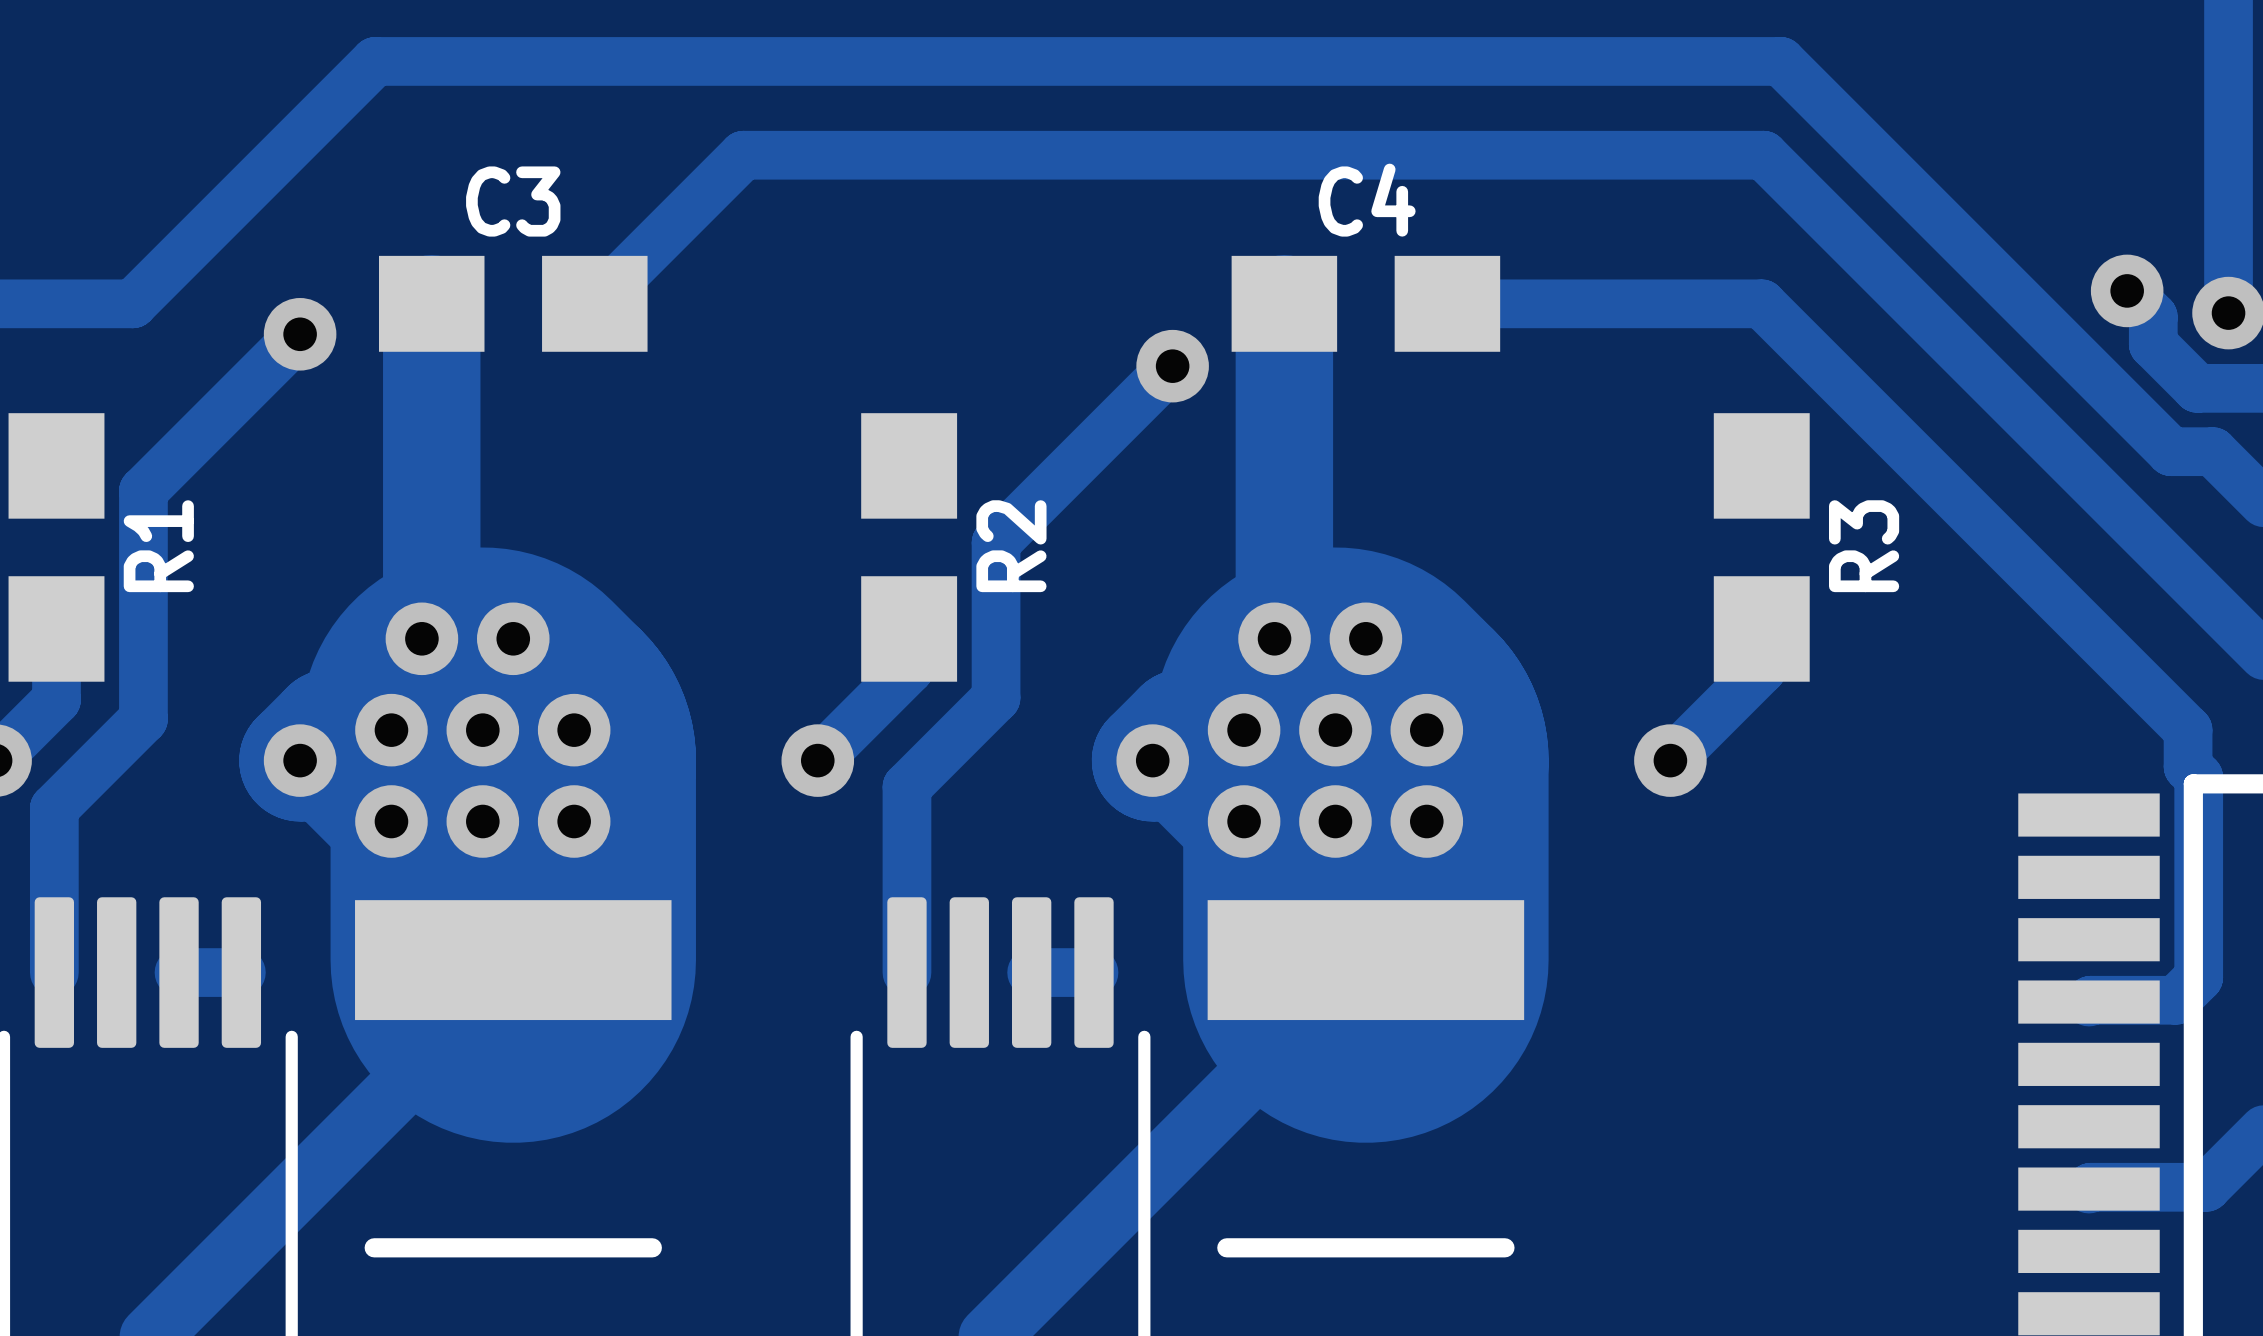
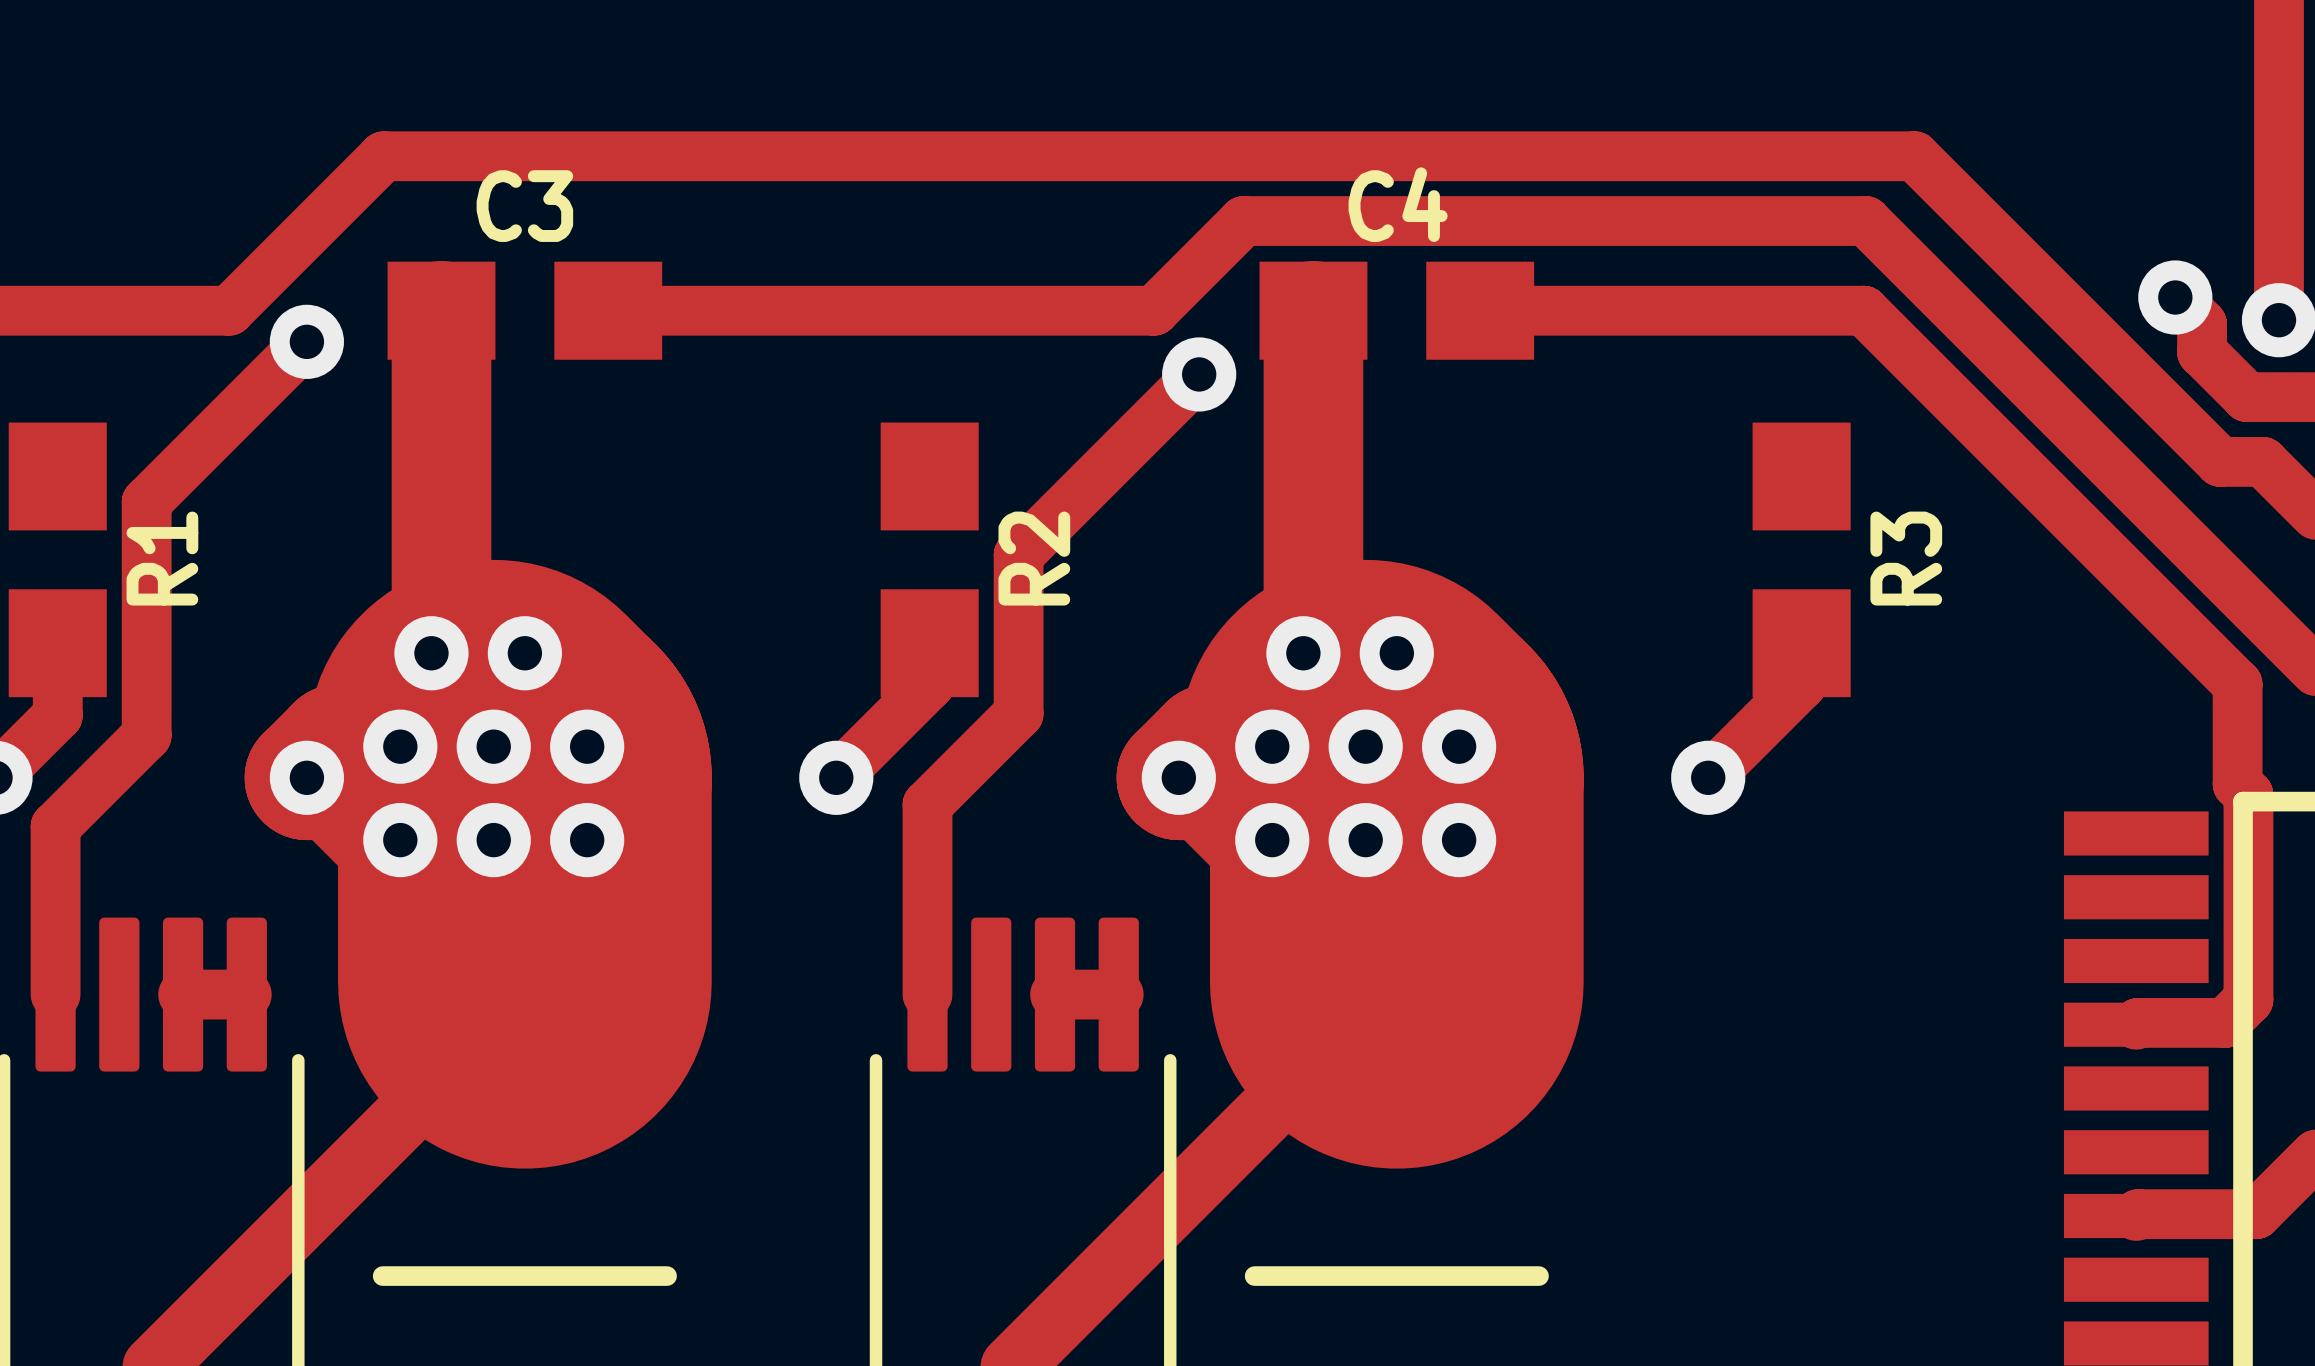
track: (1872, 152) (1780, 61) (375, 61) (132, 303) -> (1914, 156) (383, 156) (229, 310) (135, 310)
track: (1824, 216) (1763, 155) (743, 155) (594, 303) -> (1865, 221) (1243, 221) (1154, 310) (608, 310)
track: (1761, 303) (2188, 730) -> (1801, 310) (1863, 310) (2237, 684) (2237, 746)

